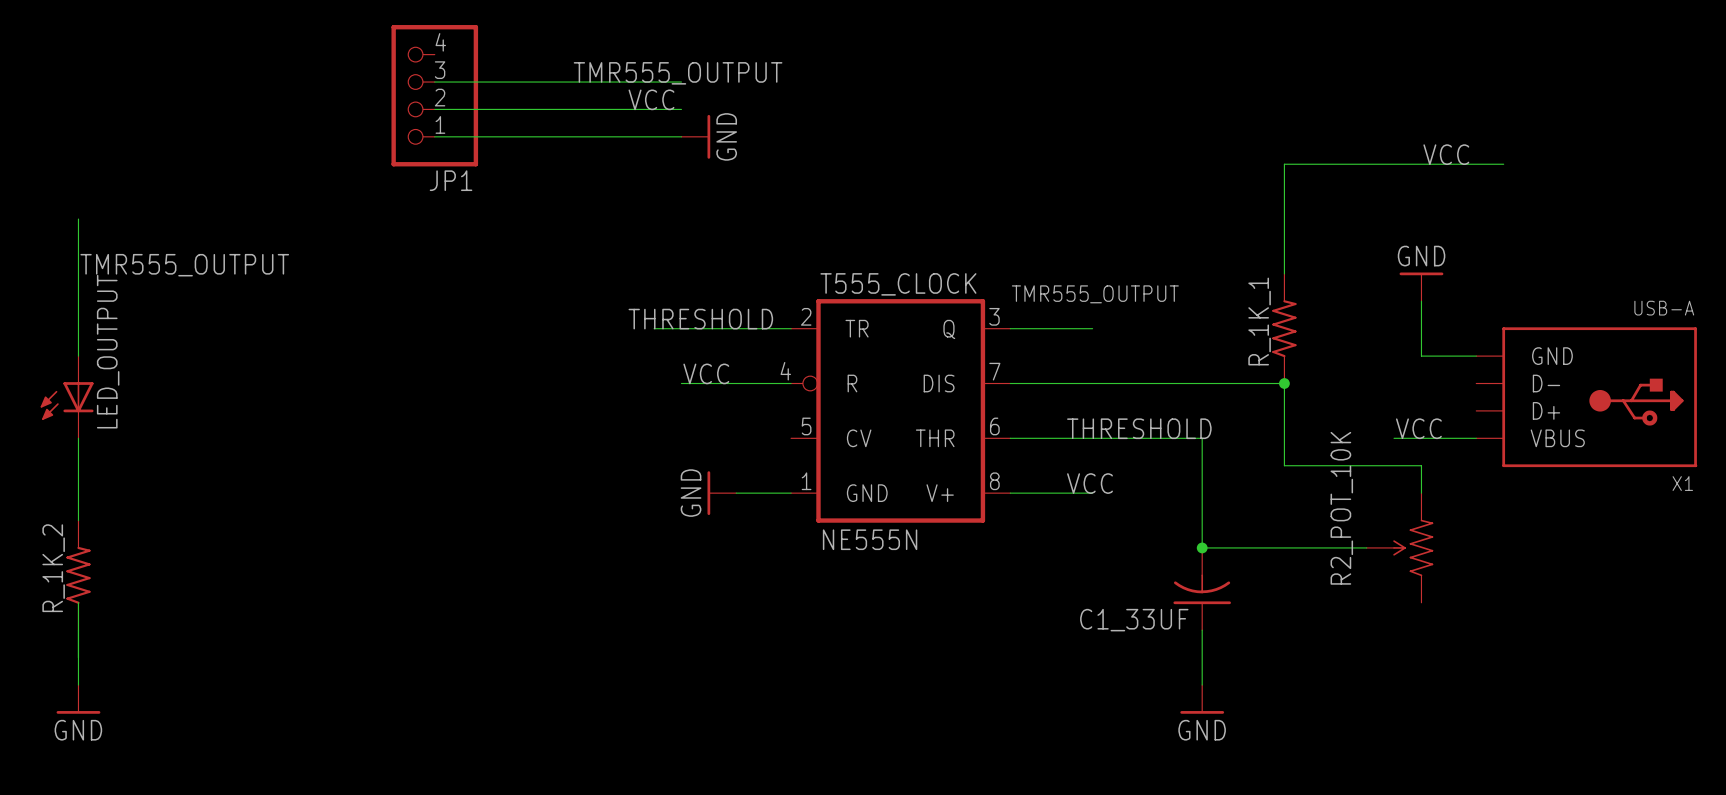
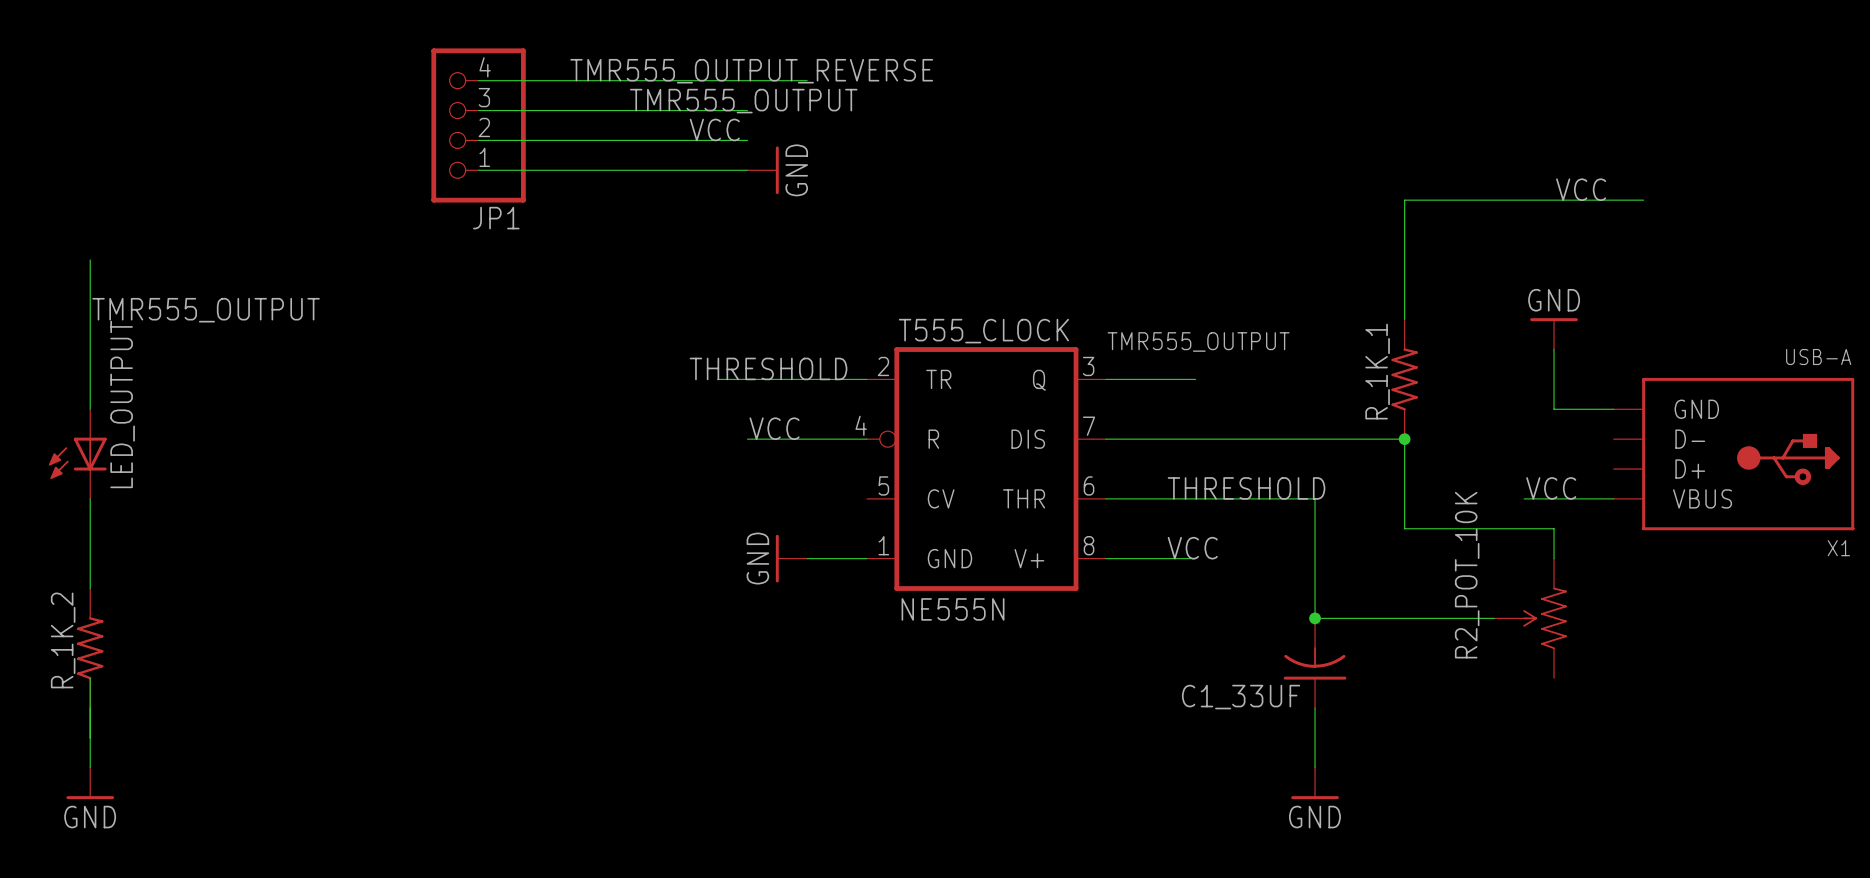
label: none -> TMR555_OUTPUT_REVERSE (751, 71)
wire: none -> (478, 80) (807, 80)

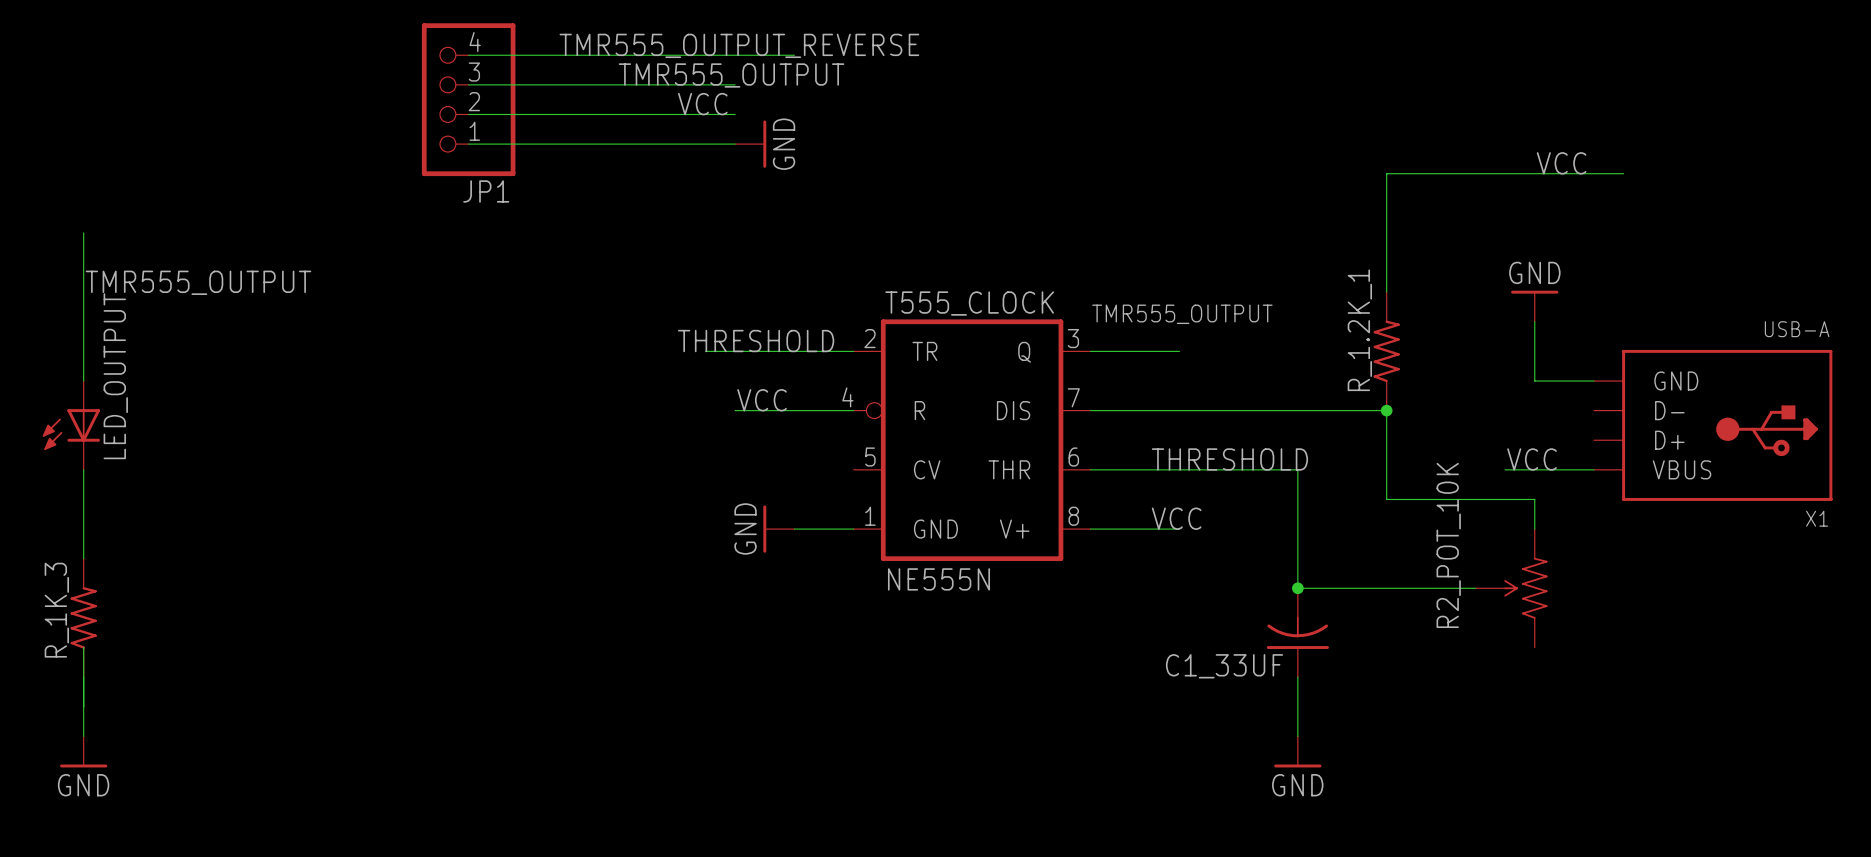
R_1K_1 name: R_1K_1 (1377, 371) -> R_1.2K_1 (1359, 330)
R_1K_2 name: R_1K_2 (63, 640) -> R_1K_3 (56, 610)

